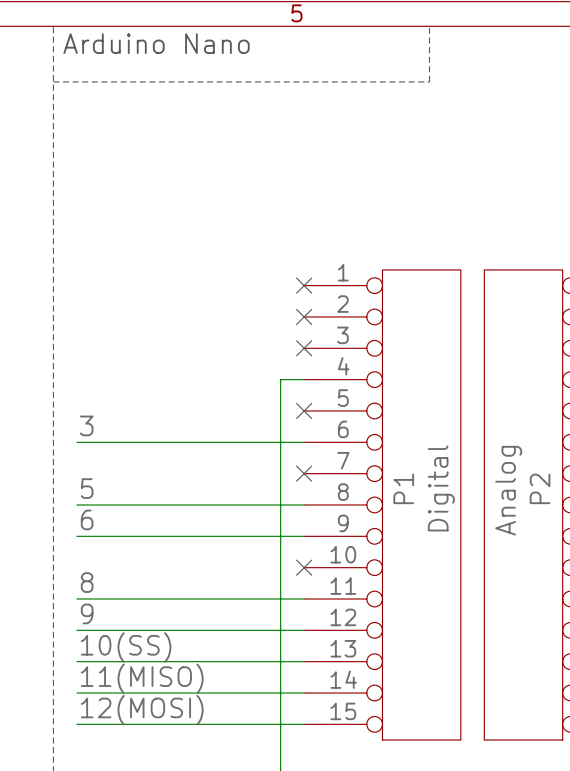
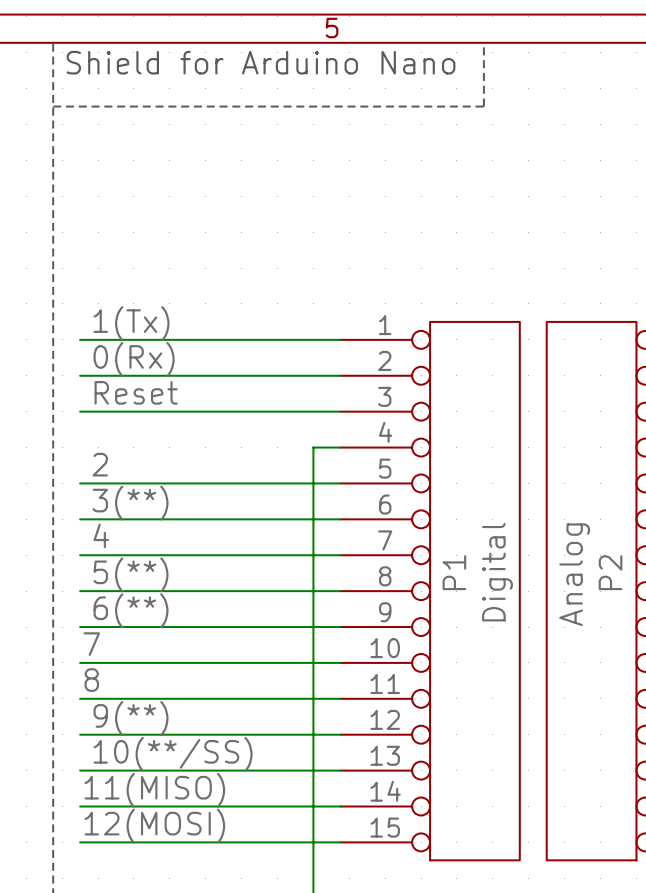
text: Arduino Nano (156, 43) -> Shield for Arduino Nano (260, 62)
label: none -> 1(Tx) (131, 323)
wire: none -> (80, 339) (340, 339)
no-connect mark: (304, 285) -> none
label: none -> 0(Rx) (134, 359)
wire: none -> (80, 375) (340, 375)
no-connect mark: (304, 316) -> none
label: none -> Reset (136, 392)
wire: none -> (80, 411) (340, 411)
no-connect mark: (304, 348) -> none
label: none -> 2 (100, 464)
wire: none -> (80, 483) (340, 483)
no-connect mark: (304, 410) -> none
label: 3 (86, 425) -> 3(**) (130, 503)
label: none -> 4 (101, 535)
wire: none -> (80, 555) (340, 555)
no-connect mark: (304, 473) -> none
label: 5 (87, 488) -> 5(**) (131, 574)
label: 6 (87, 519) -> 6(**) (131, 610)
label: none -> 7 (91, 644)
wire: none -> (80, 662) (340, 662)
no-connect mark: (304, 567) -> none
label: 9 (87, 613) -> 9(**) (131, 718)
label: 10(SS) (126, 647) -> 10(**/SS) (173, 754)

